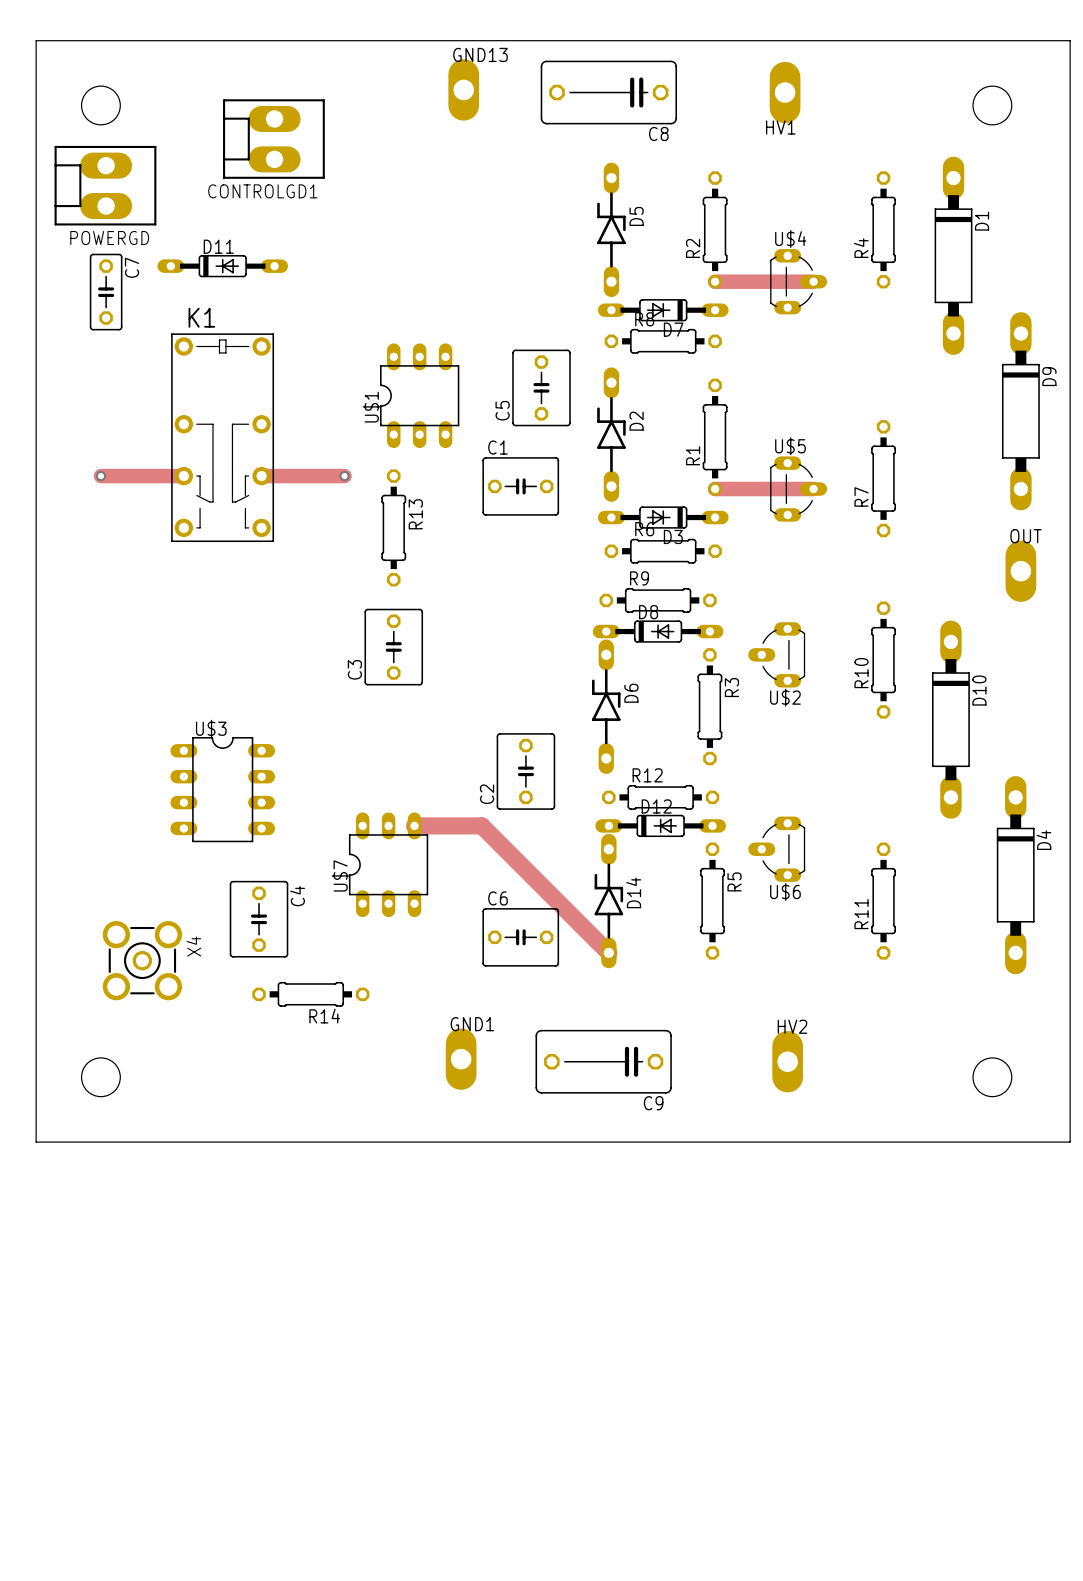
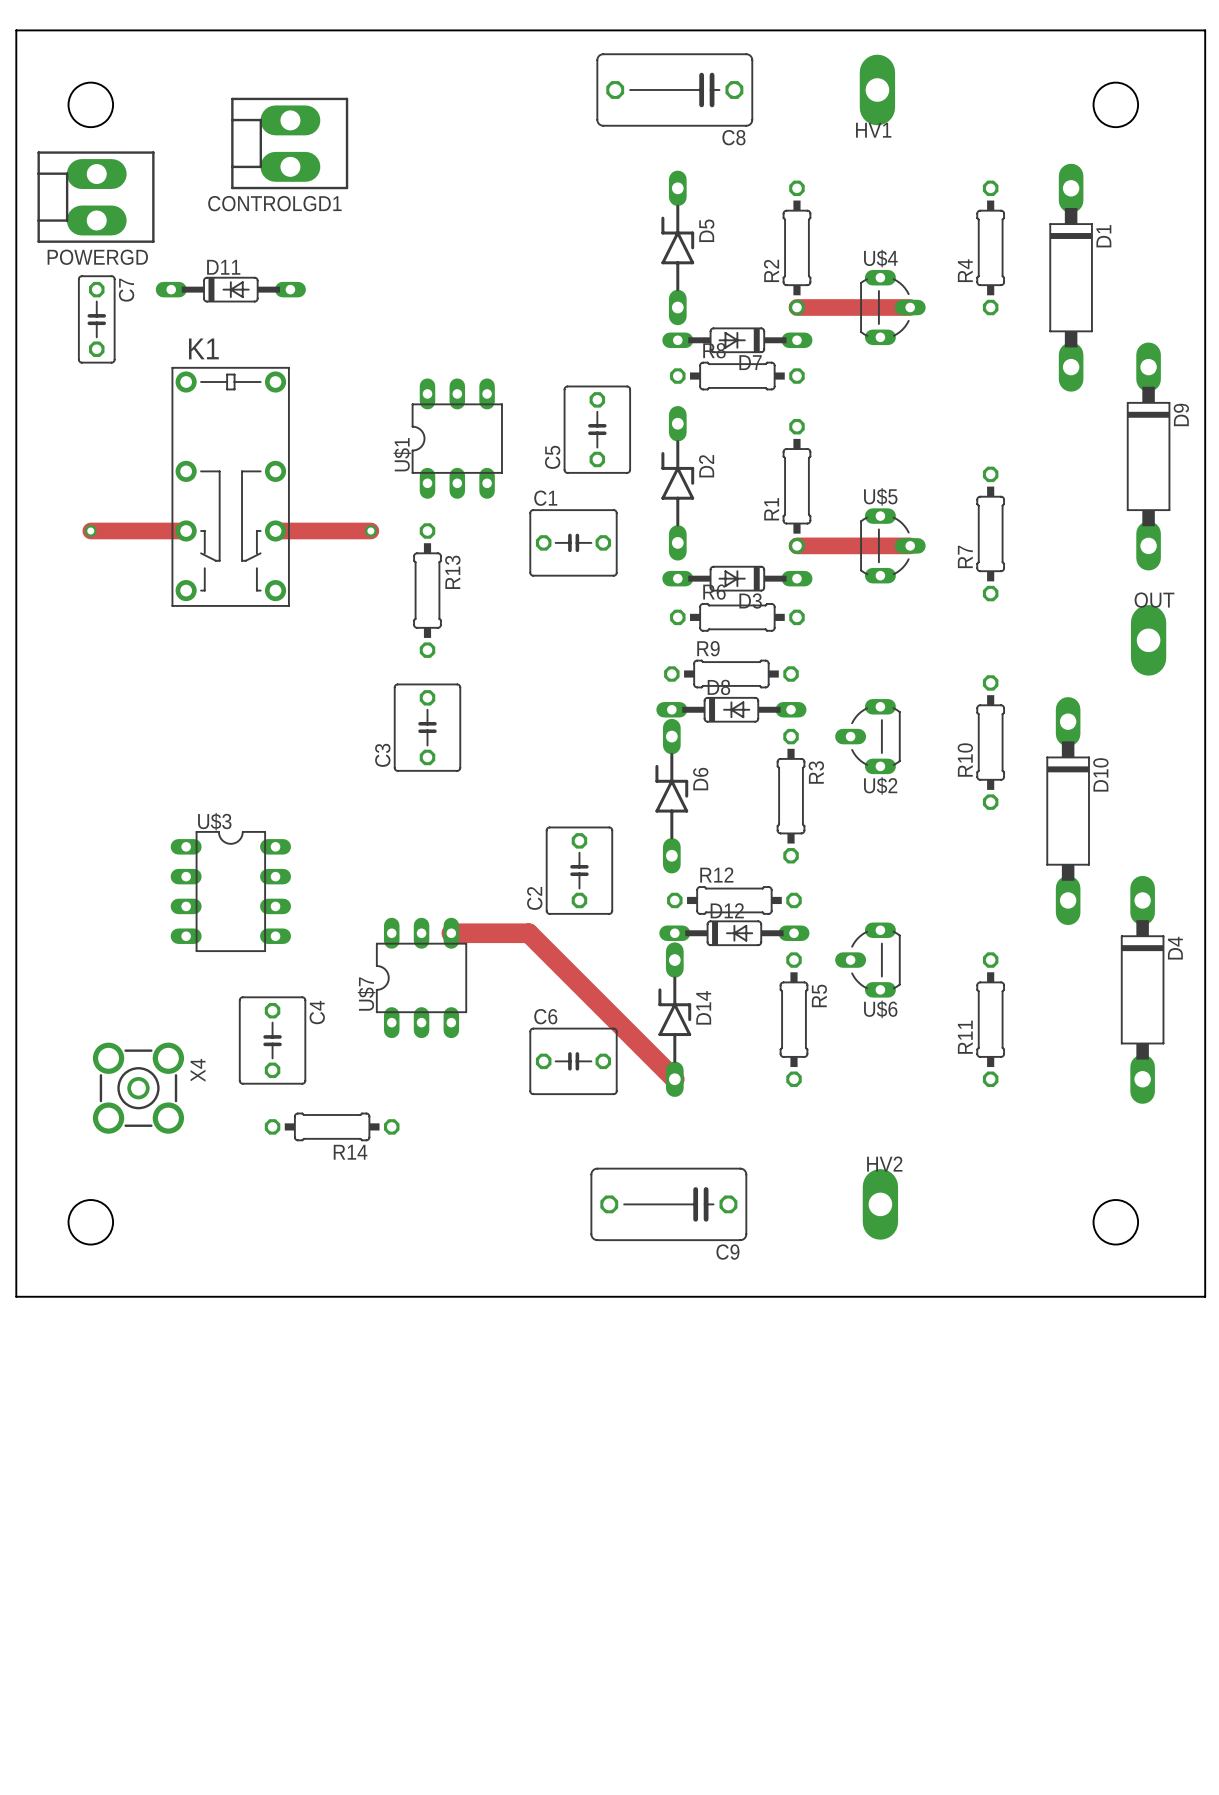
GND13: (463, 89) -> none
GND1: (461, 1059) -> none

